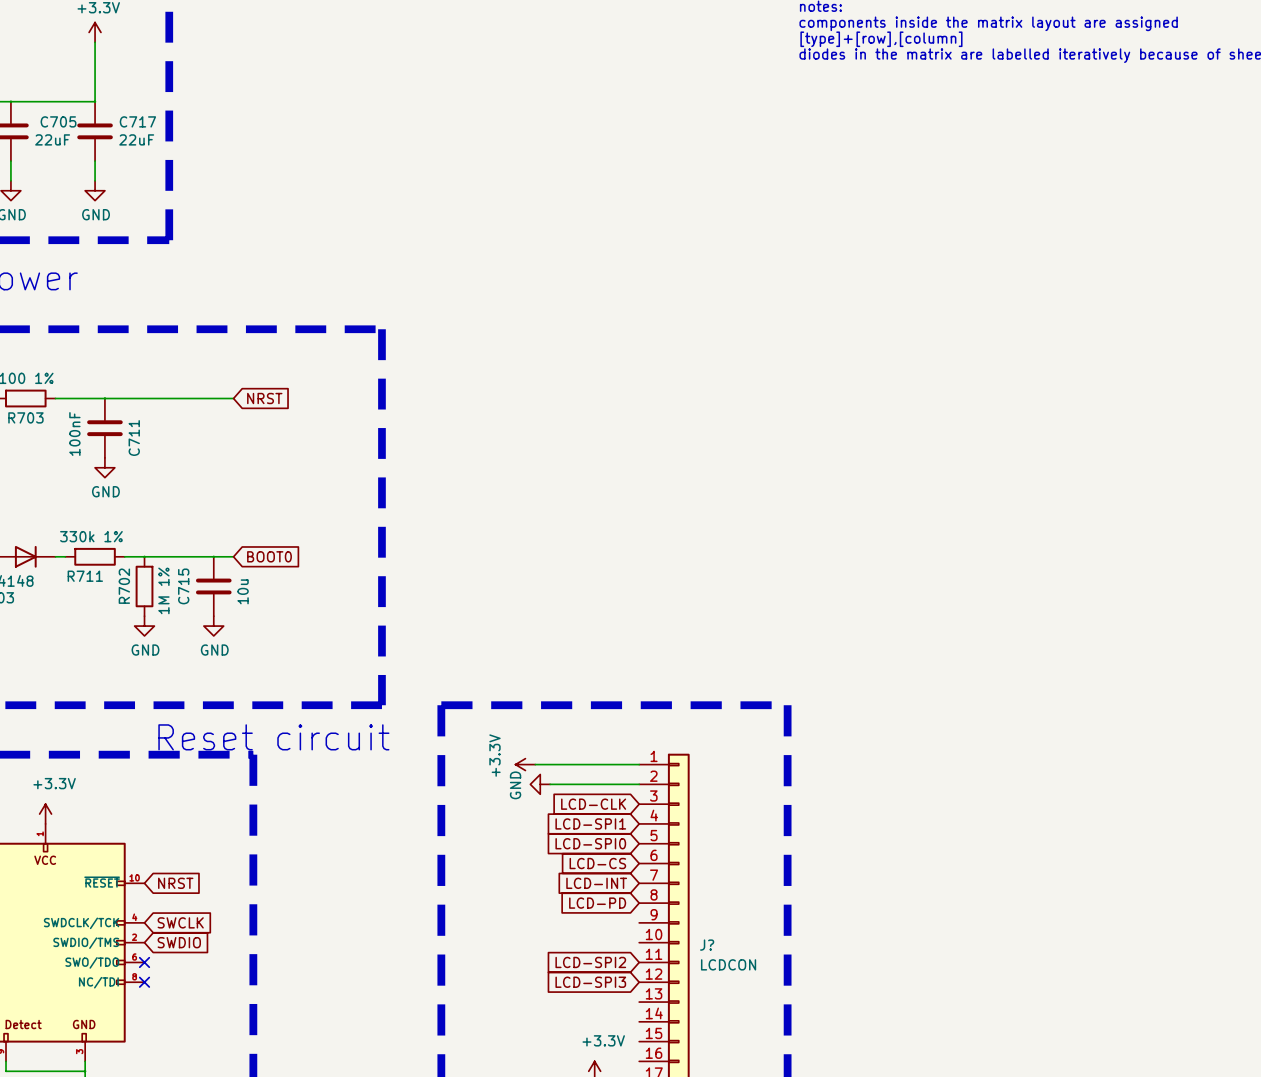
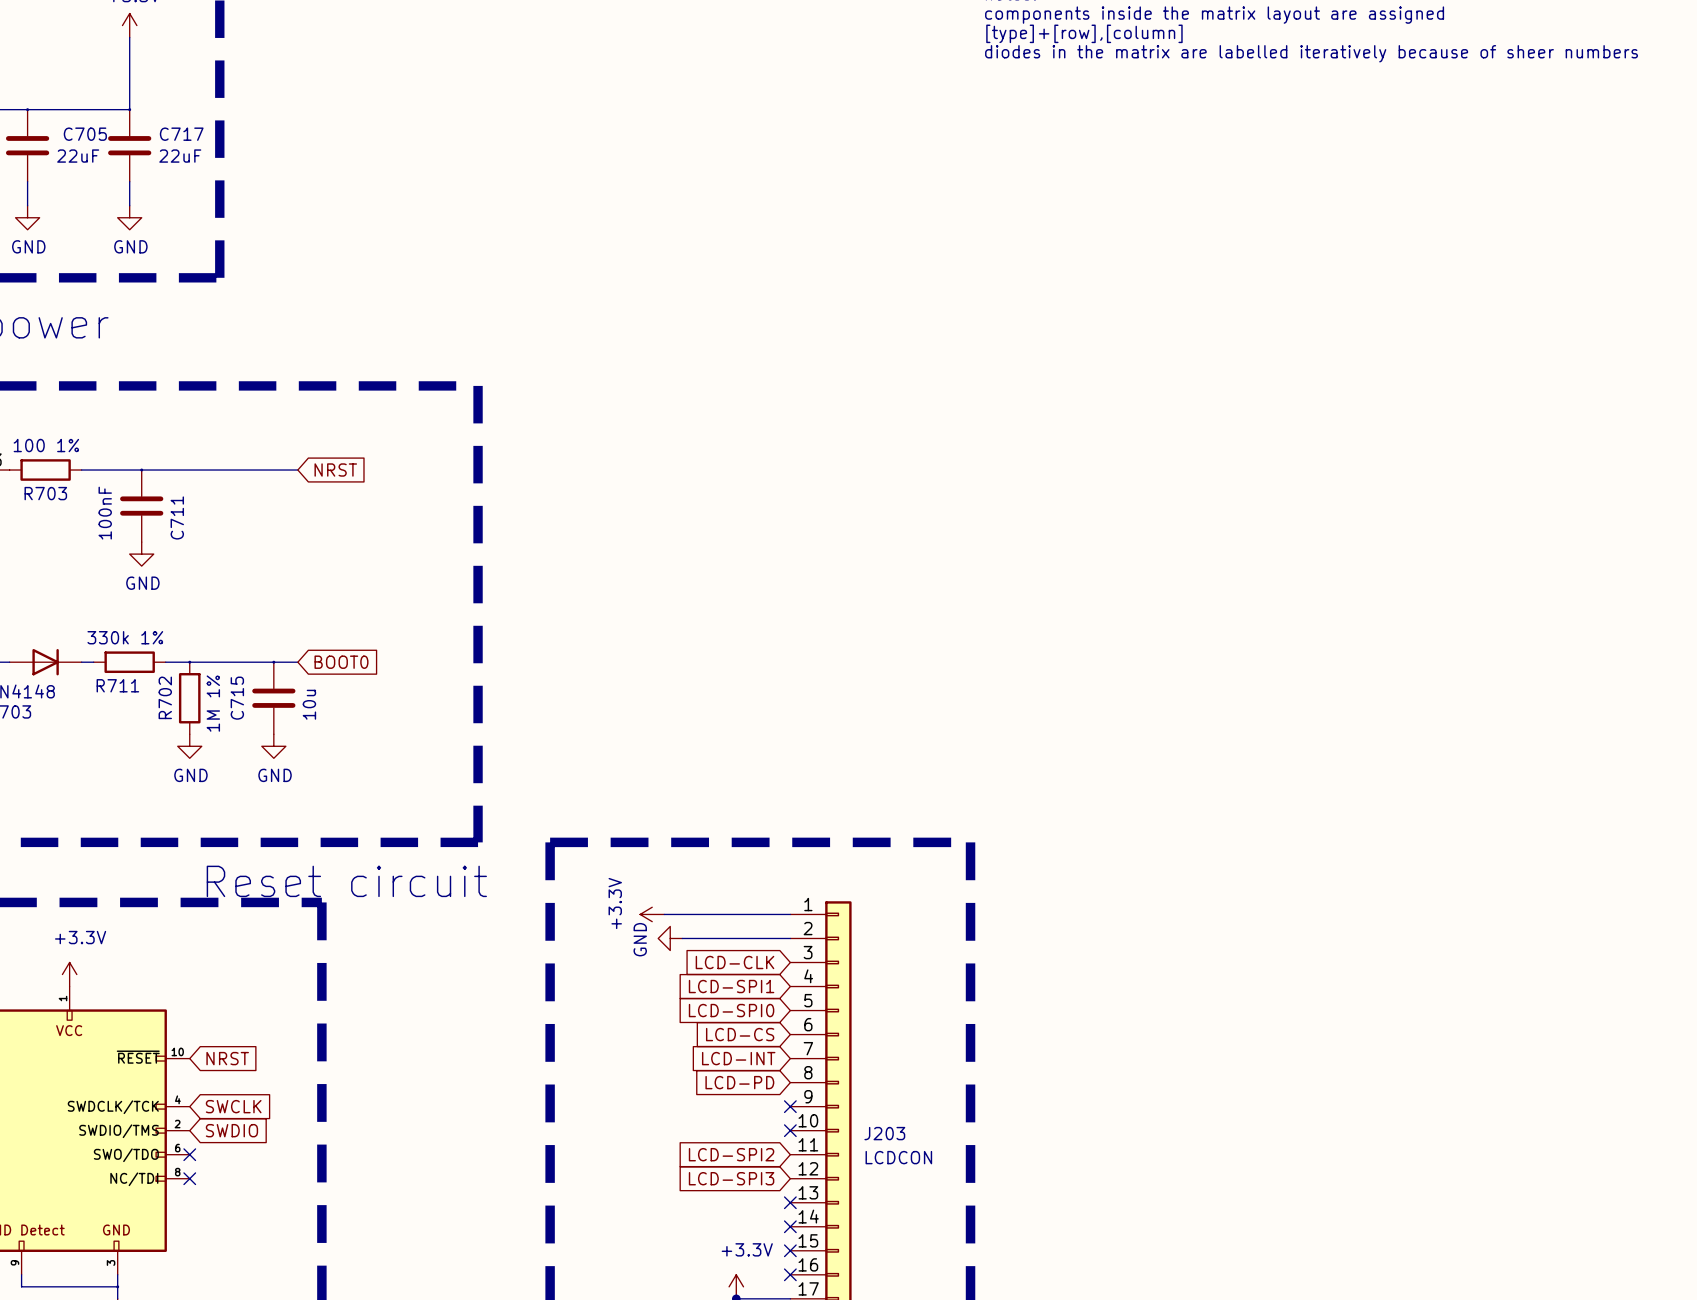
no-connect mark: none -> (790, 1106)
no-connect mark: none -> (790, 1130)
J? name: J? (707, 945) -> J203 (884, 1133)
no-connect mark: none -> (790, 1202)
no-connect mark: none -> (790, 1226)
no-connect mark: none -> (790, 1250)
no-connect mark: none -> (790, 1274)

